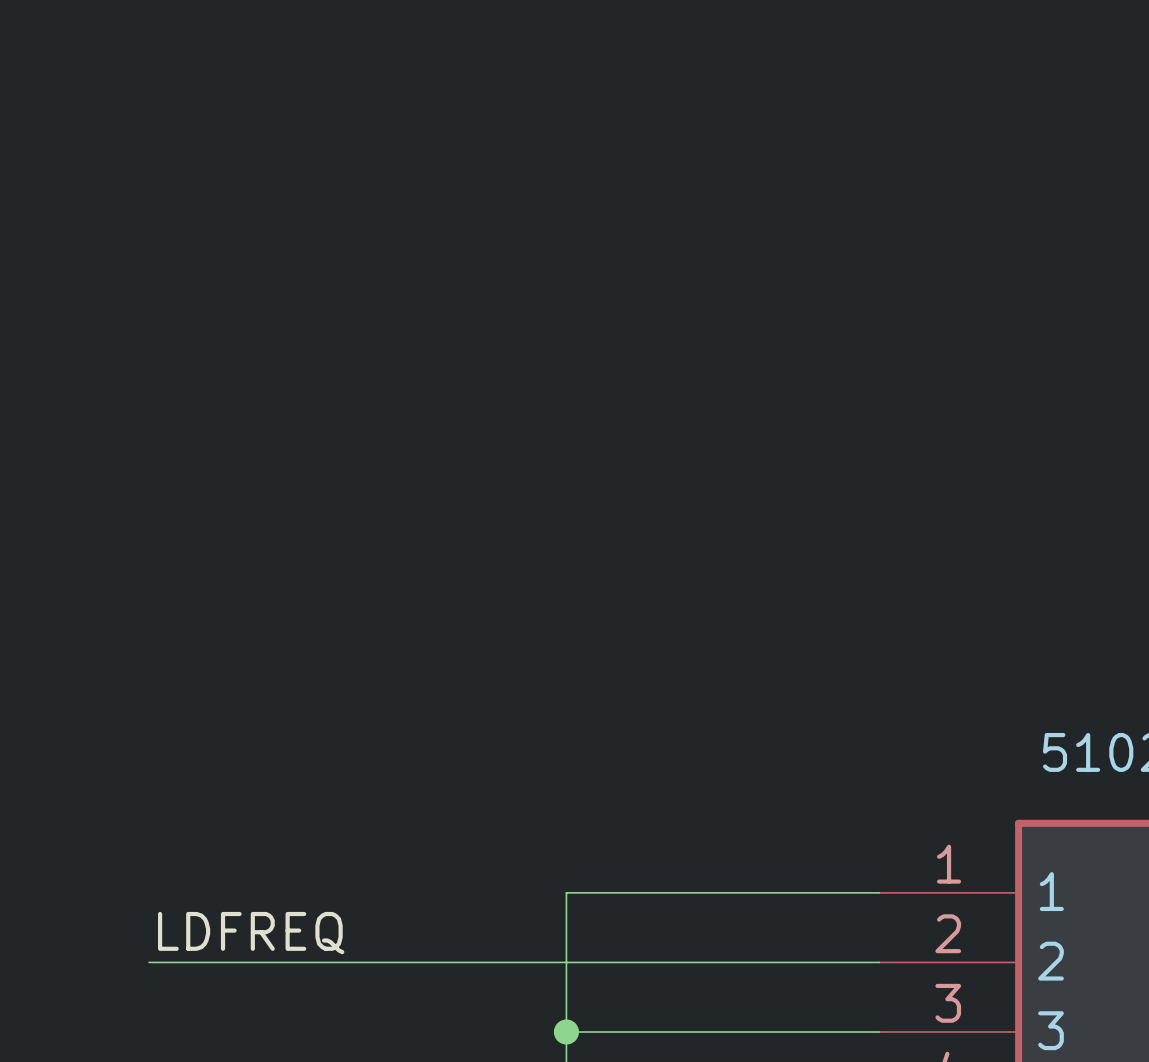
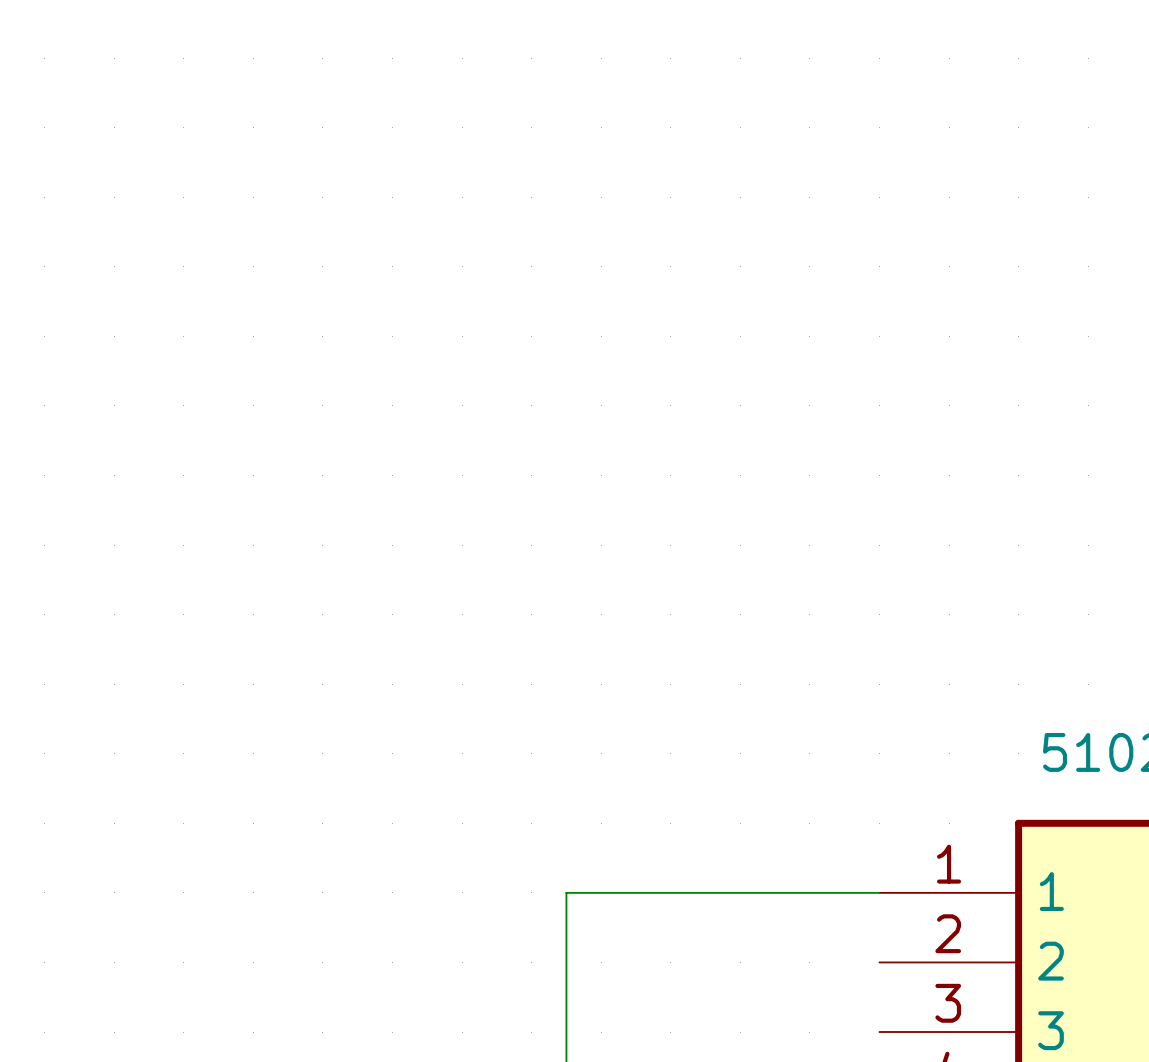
label: LDFREQ (251, 933) -> none
wire: (149, 962) (879, 962) -> none
wire: (566, 1032) (879, 1032) -> none
junction: (566, 1032) -> none

